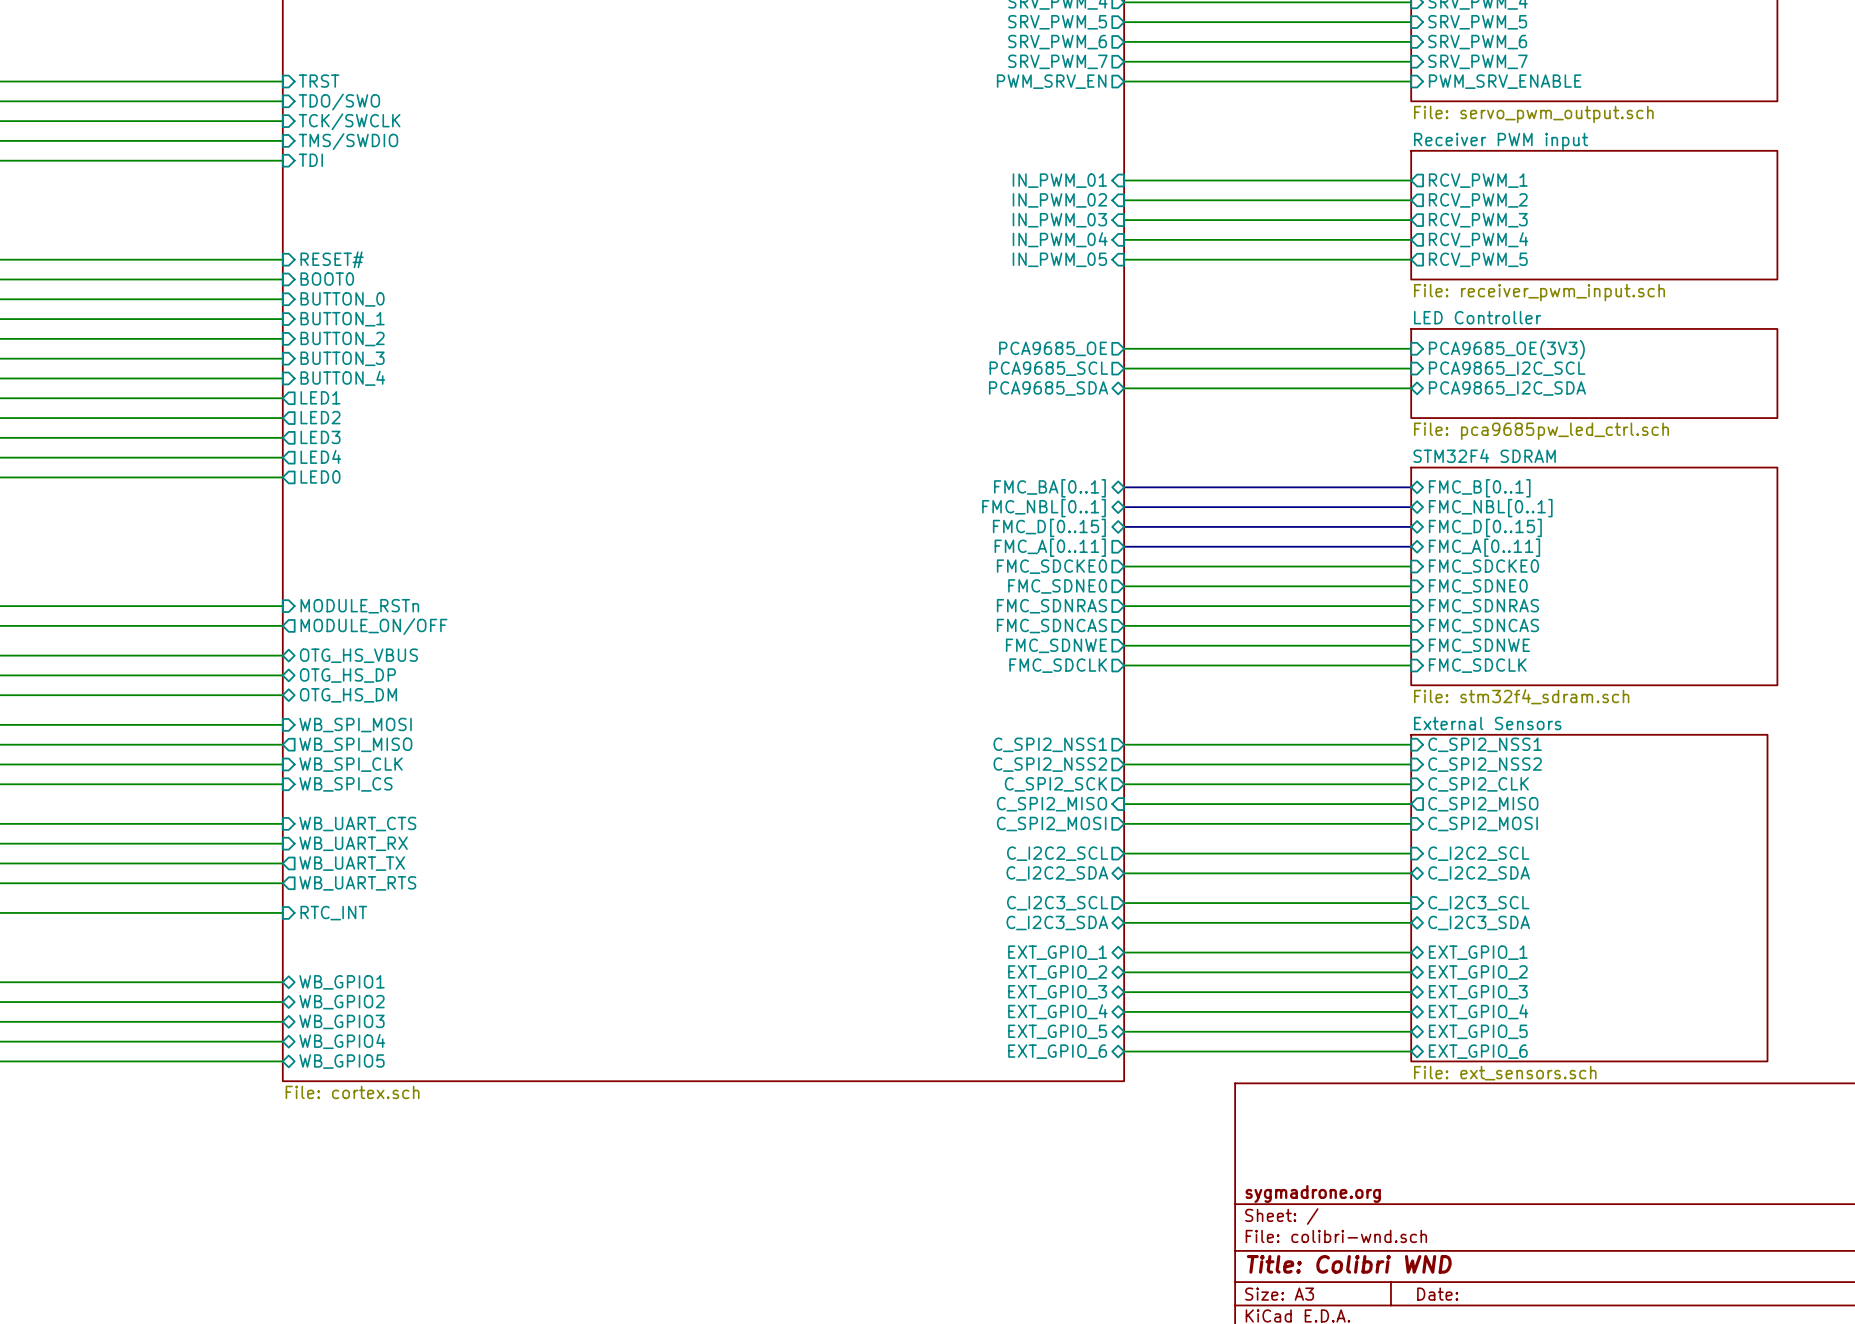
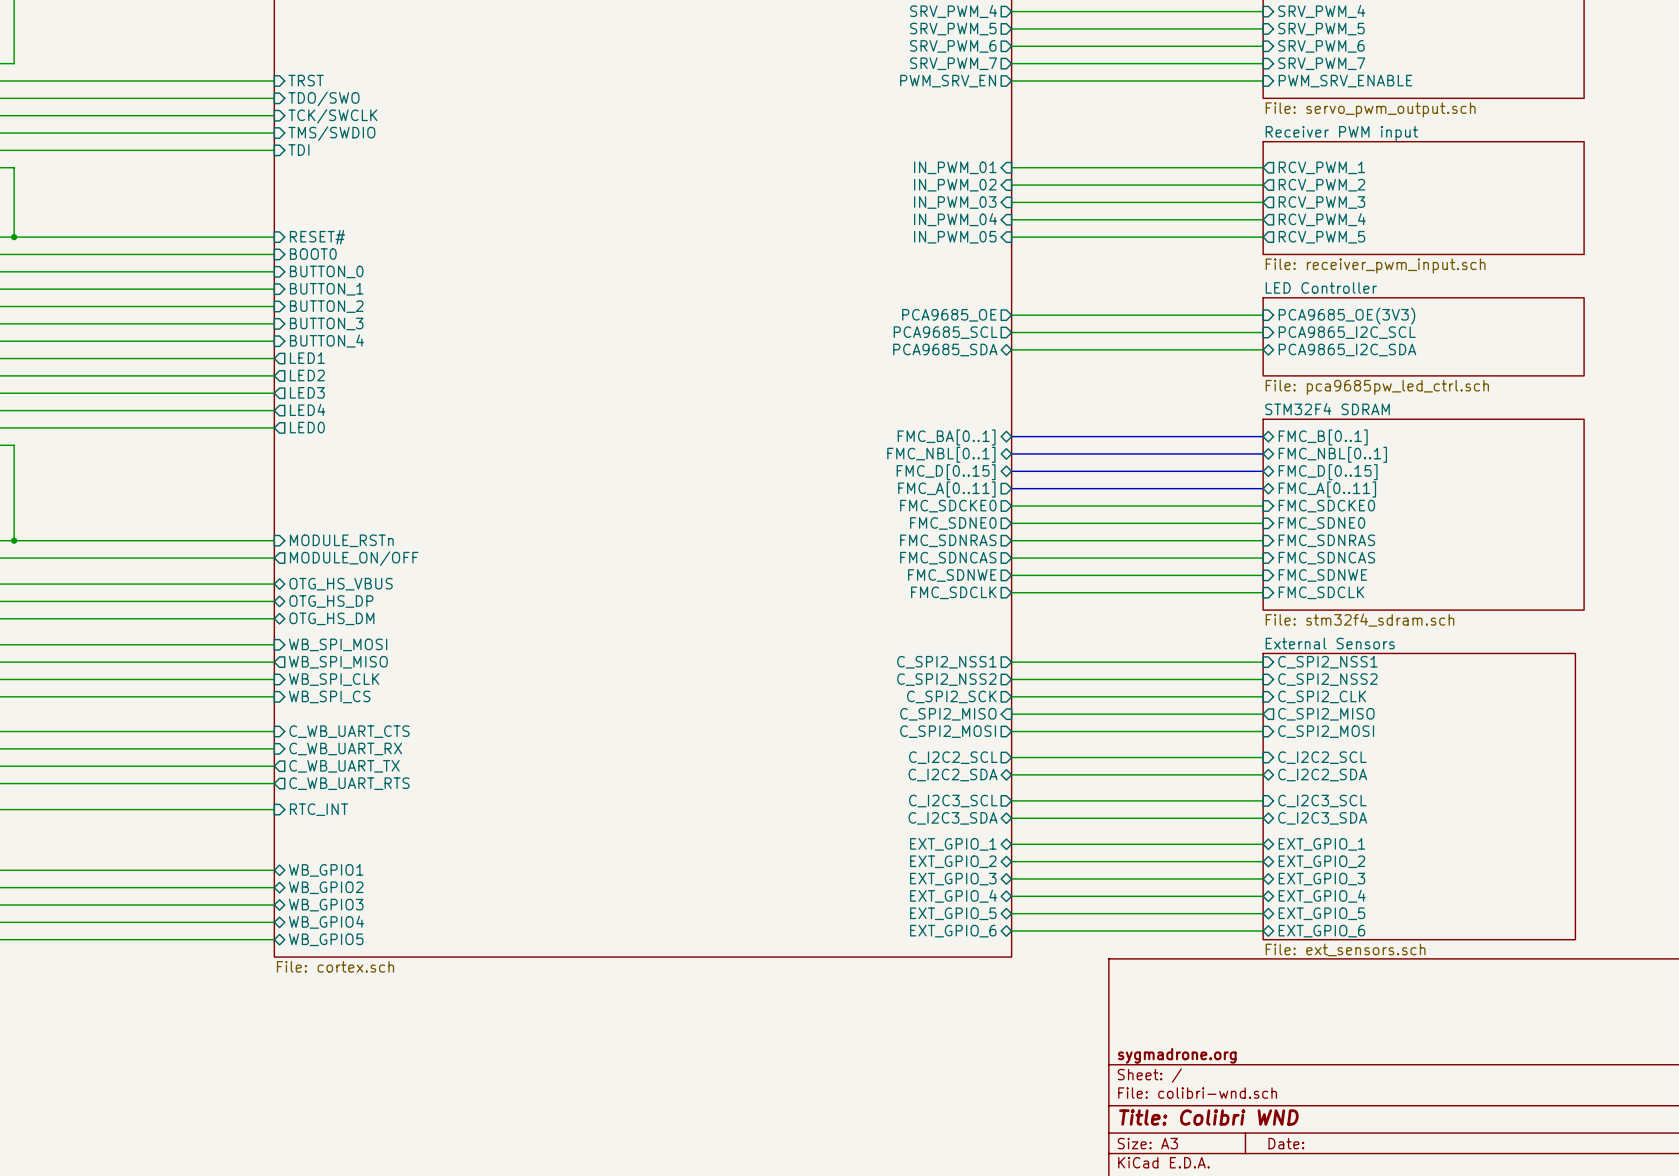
sheet pin: WB_UART_CTS (357, 824) -> C_WB_UART_CTS (349, 731)
sheet pin: WB_UART_RX (353, 843) -> C_WB_UART_RX (345, 748)
sheet pin: WB_UART_TX (352, 863) -> C_WB_UART_TX (344, 766)
sheet pin: WB_UART_RTS (357, 883) -> C_WB_UART_RTS (349, 783)

